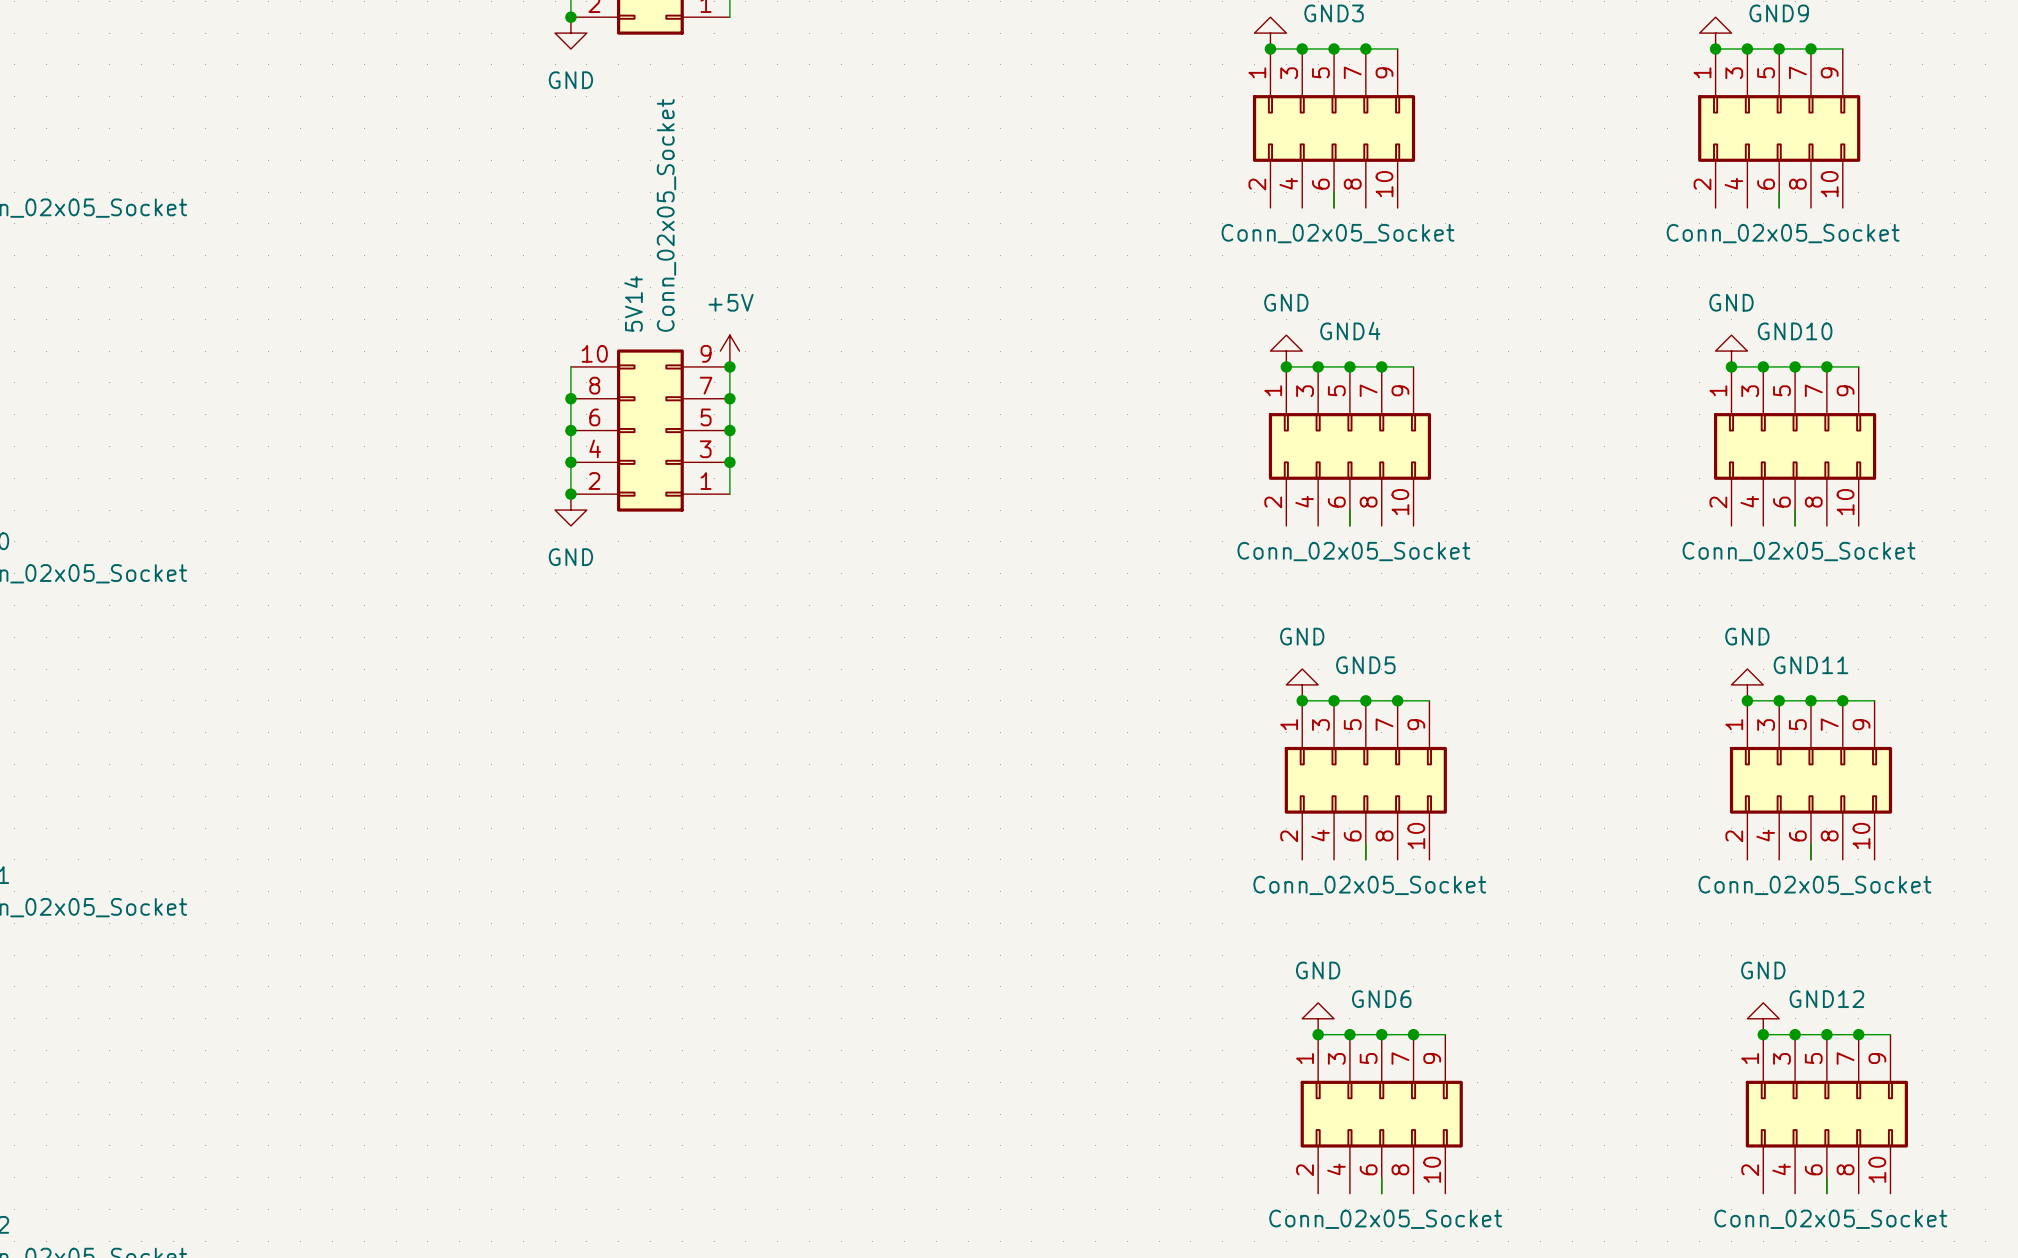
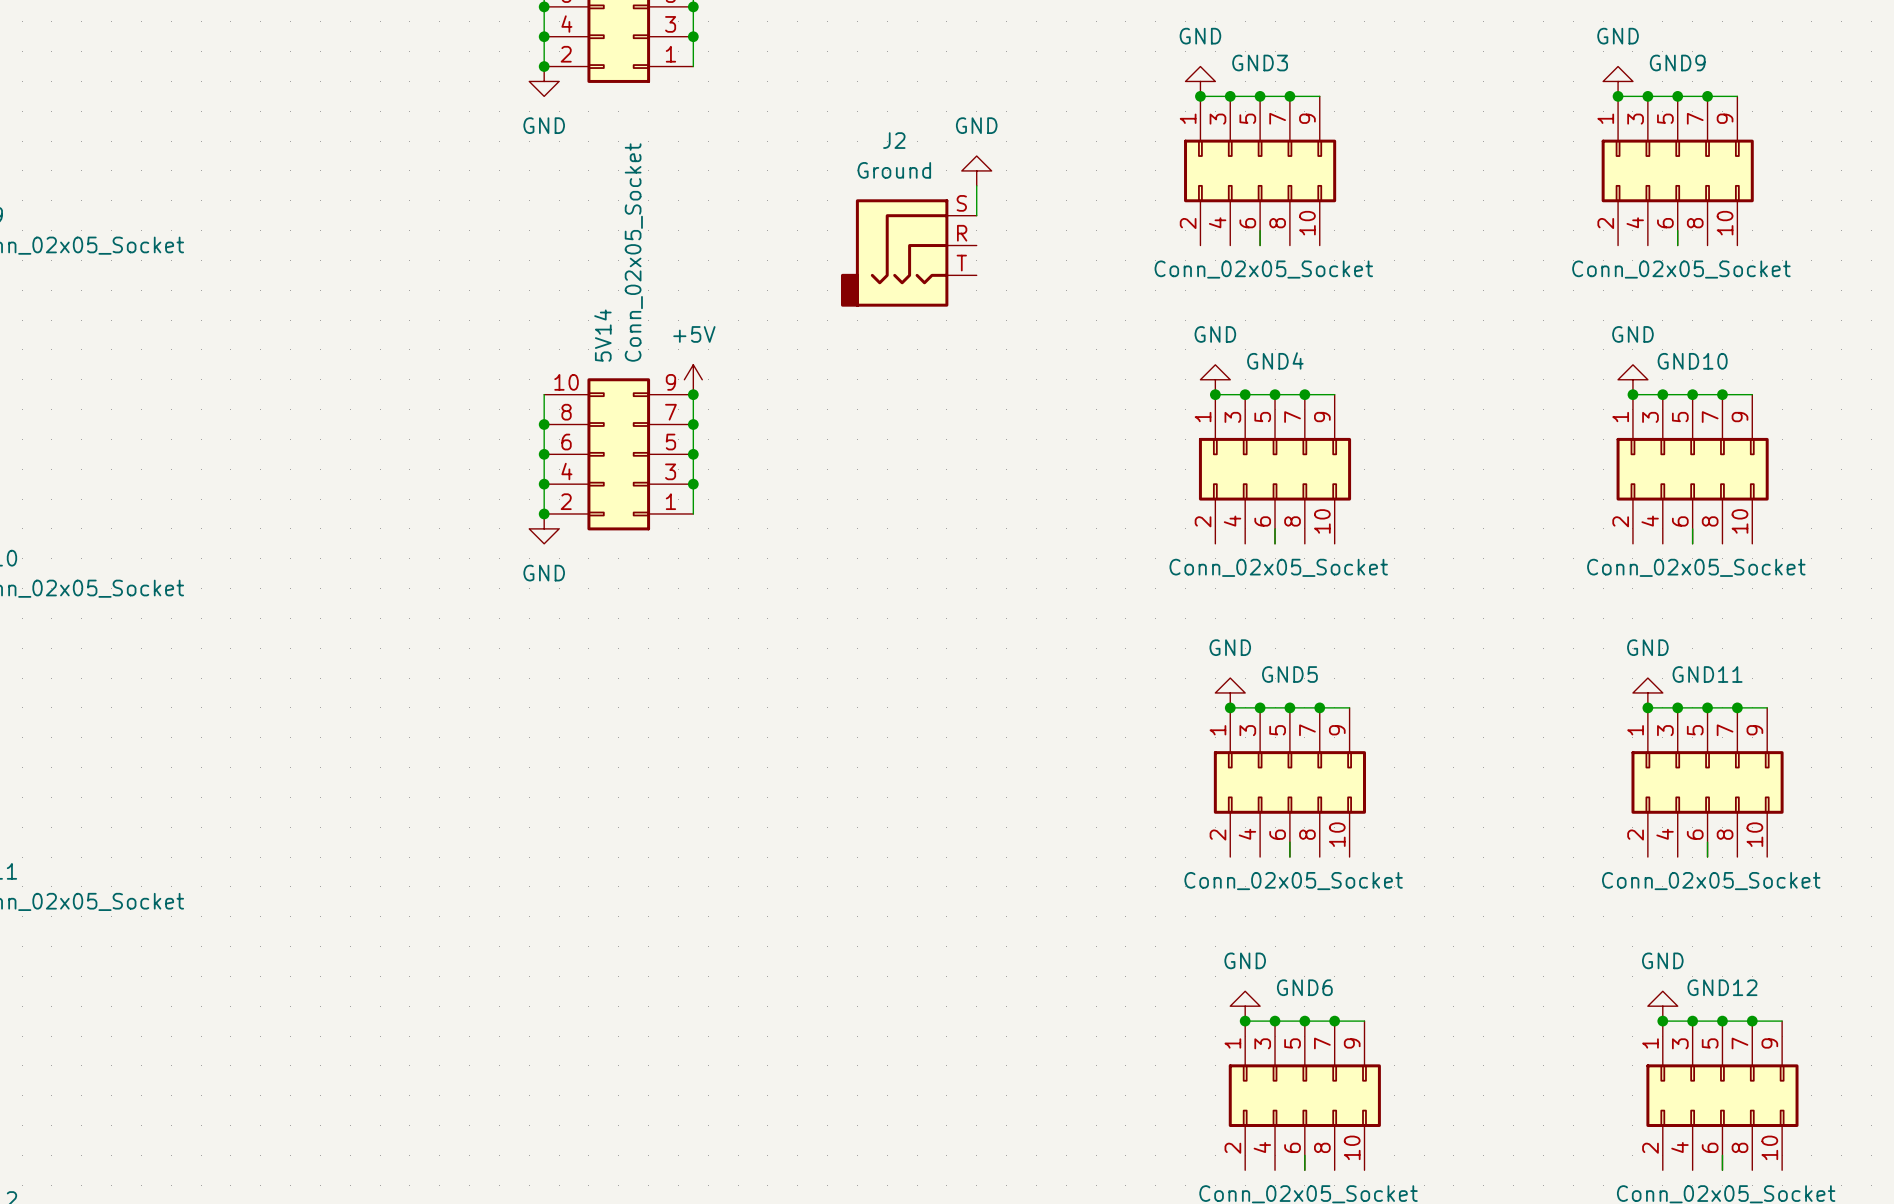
power symbol: none -> GND (976, 170)
wire: none -> (976, 185) (976, 215)
J2: none -> Ground (908, 252)

